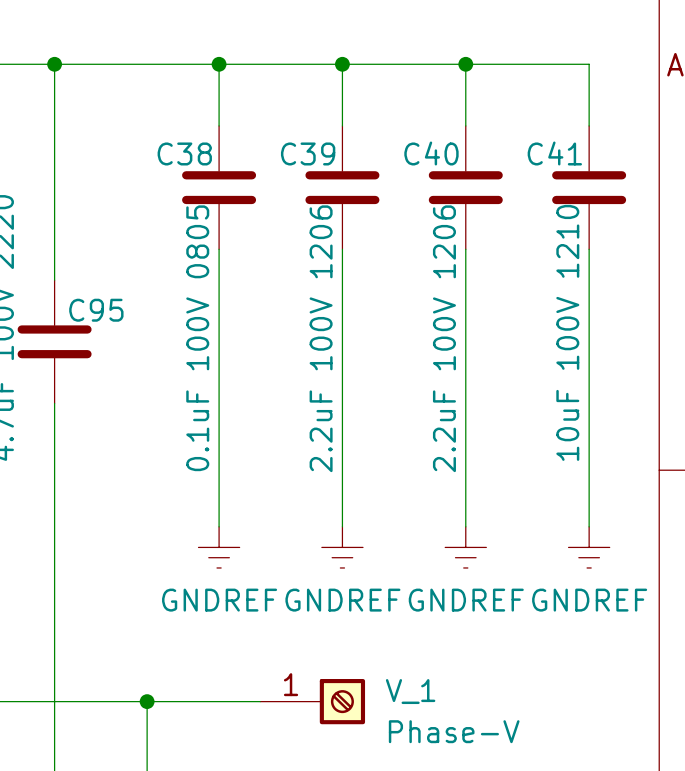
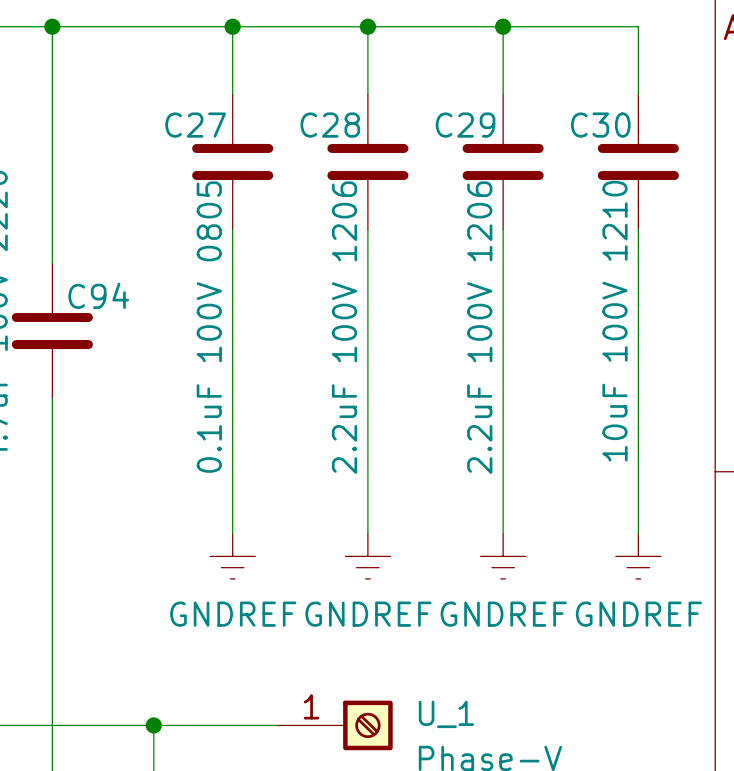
C38 name: C38 (184, 153) -> C27 (195, 125)
C39 name: C39 (308, 153) -> C28 (330, 125)
C40 name: C40 (431, 153) -> C29 (465, 125)
C41 name: C41 (554, 153) -> C30 (600, 125)
C95 name: C95 (96, 310) -> C94 (98, 295)
V_1 name: V_1 (410, 691) -> U_1 (446, 714)

